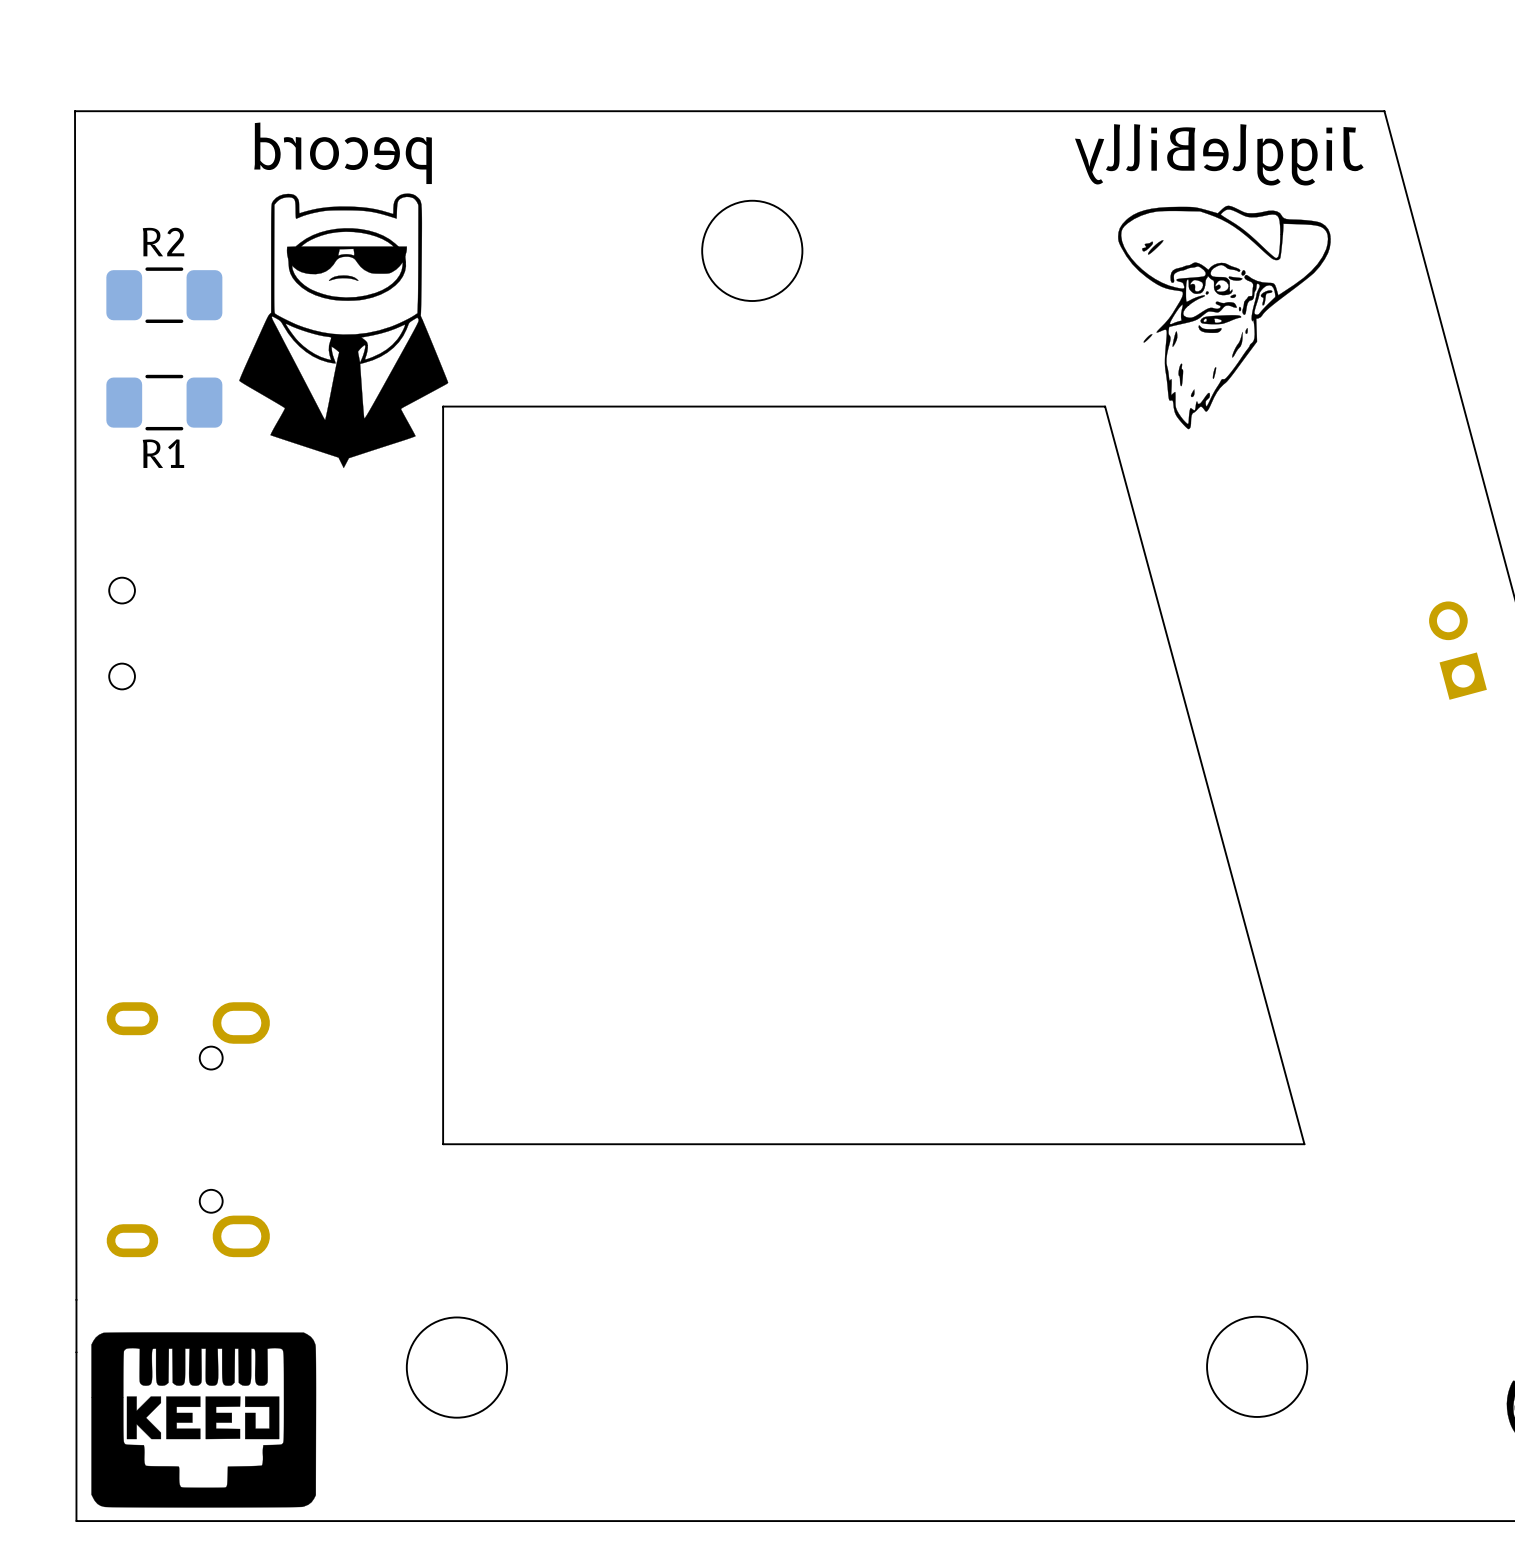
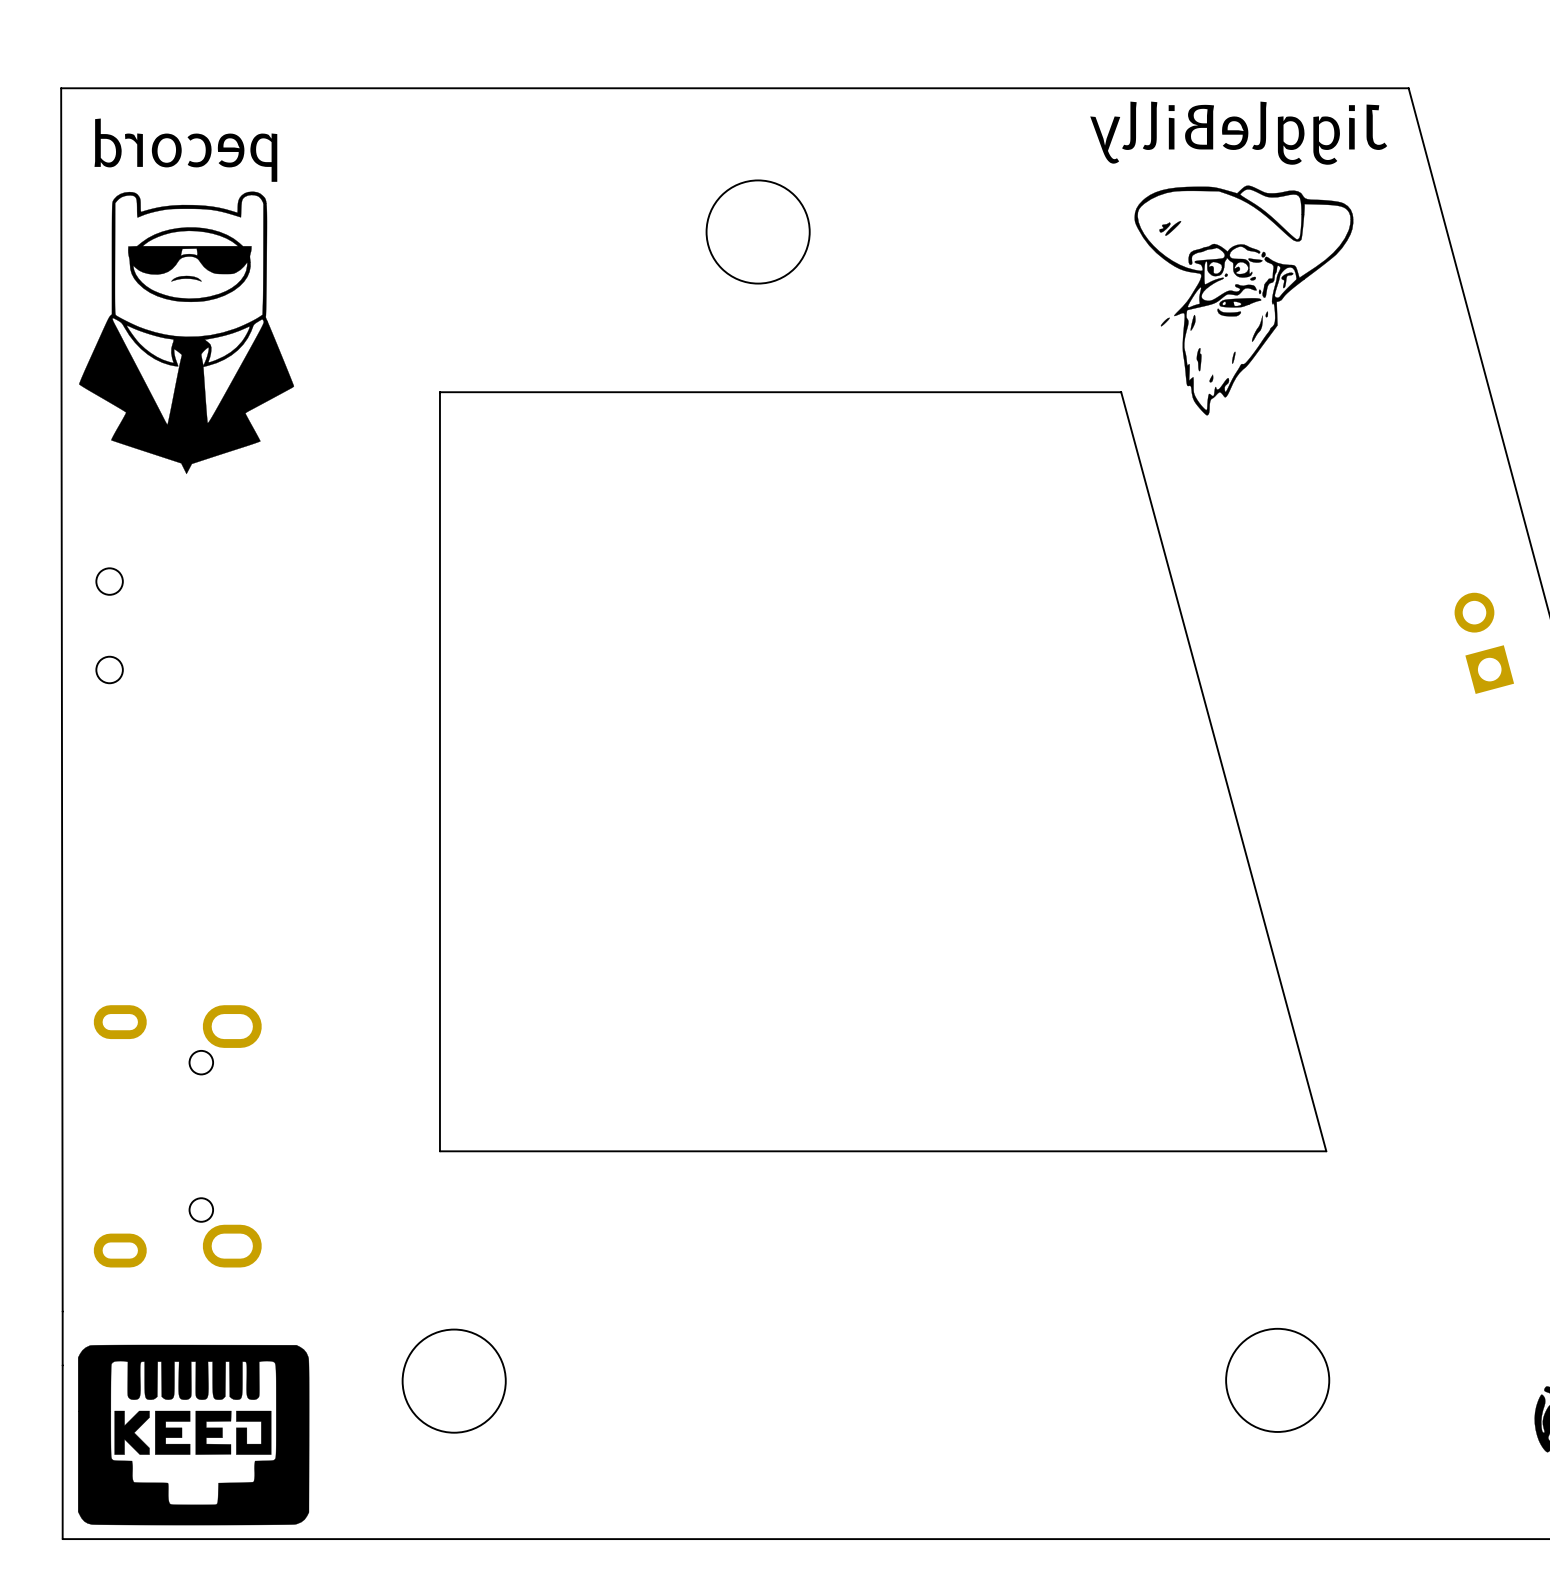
R2: (164, 295) -> none
drawing position: (343, 330) -> (186, 332)
R1: (164, 402) -> none

